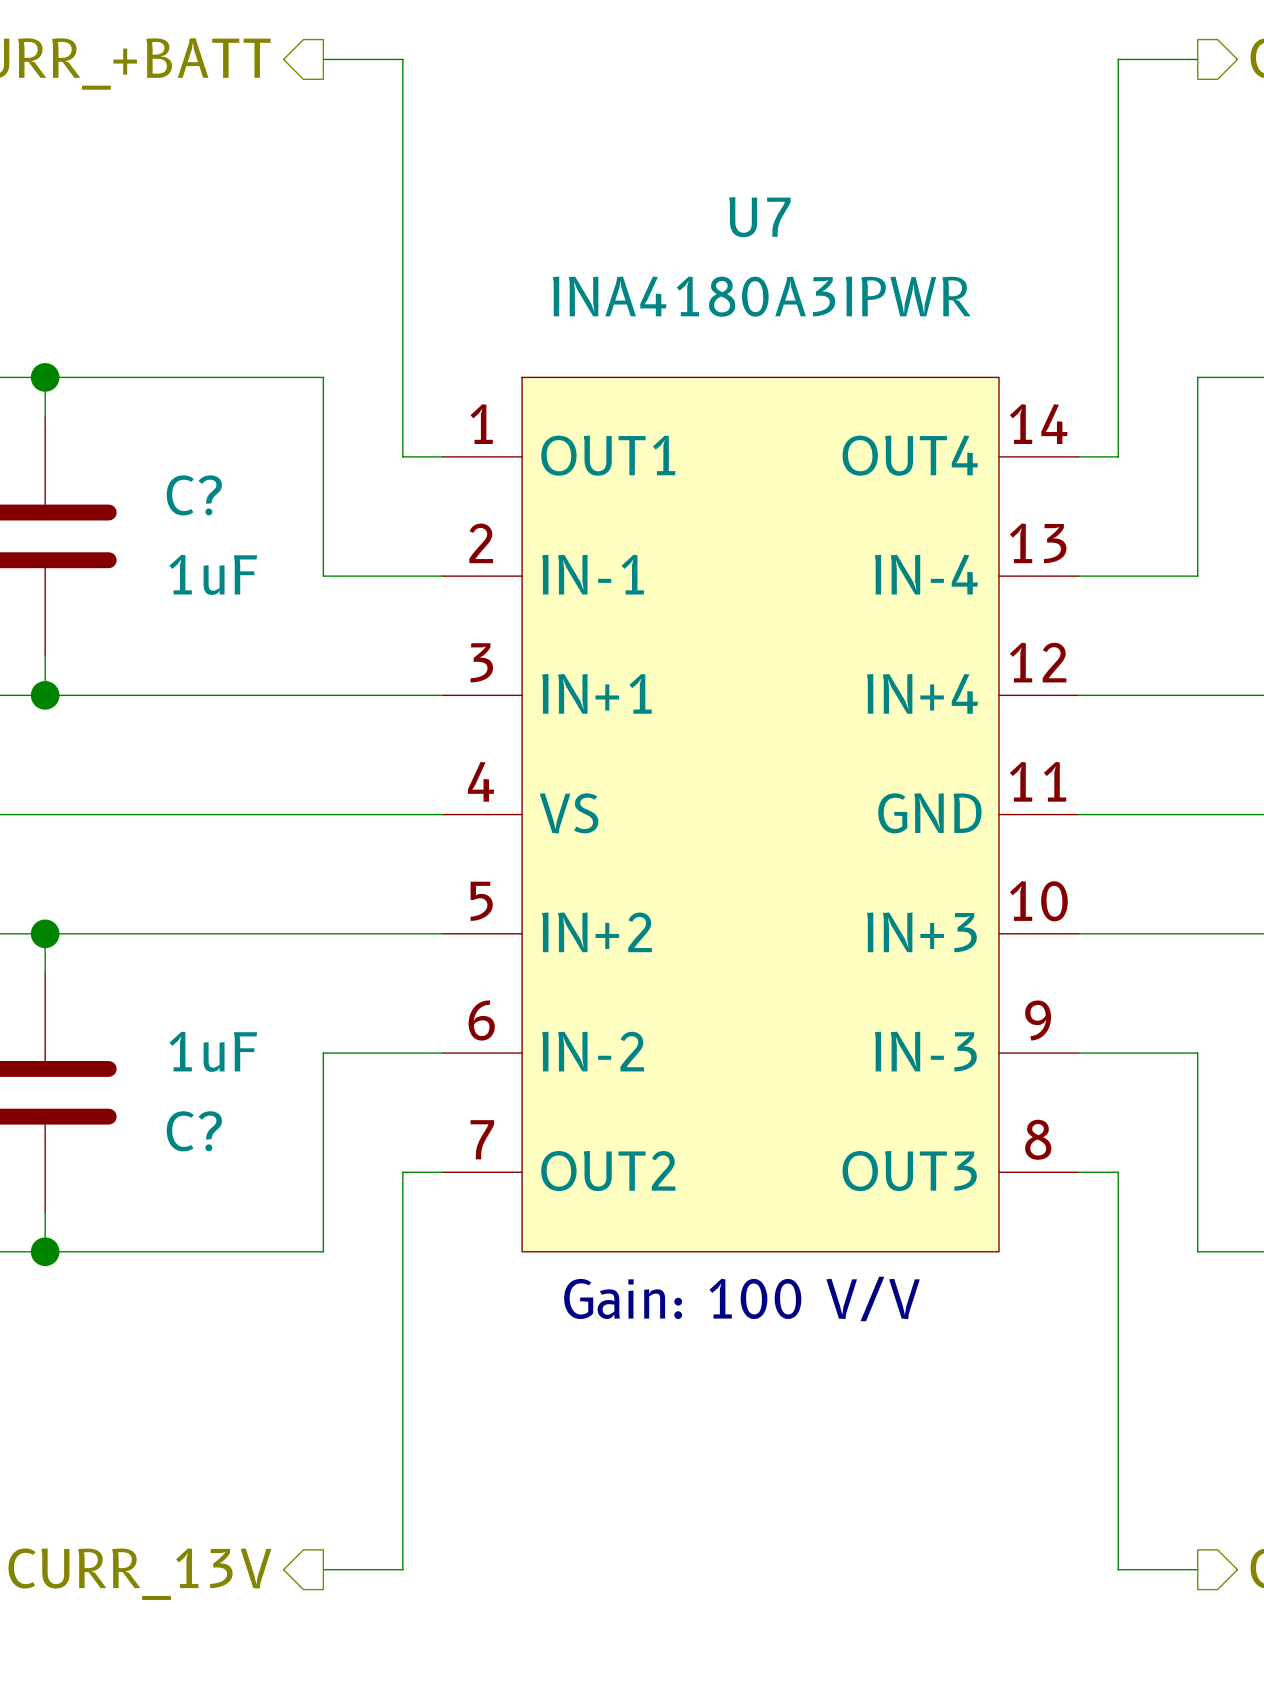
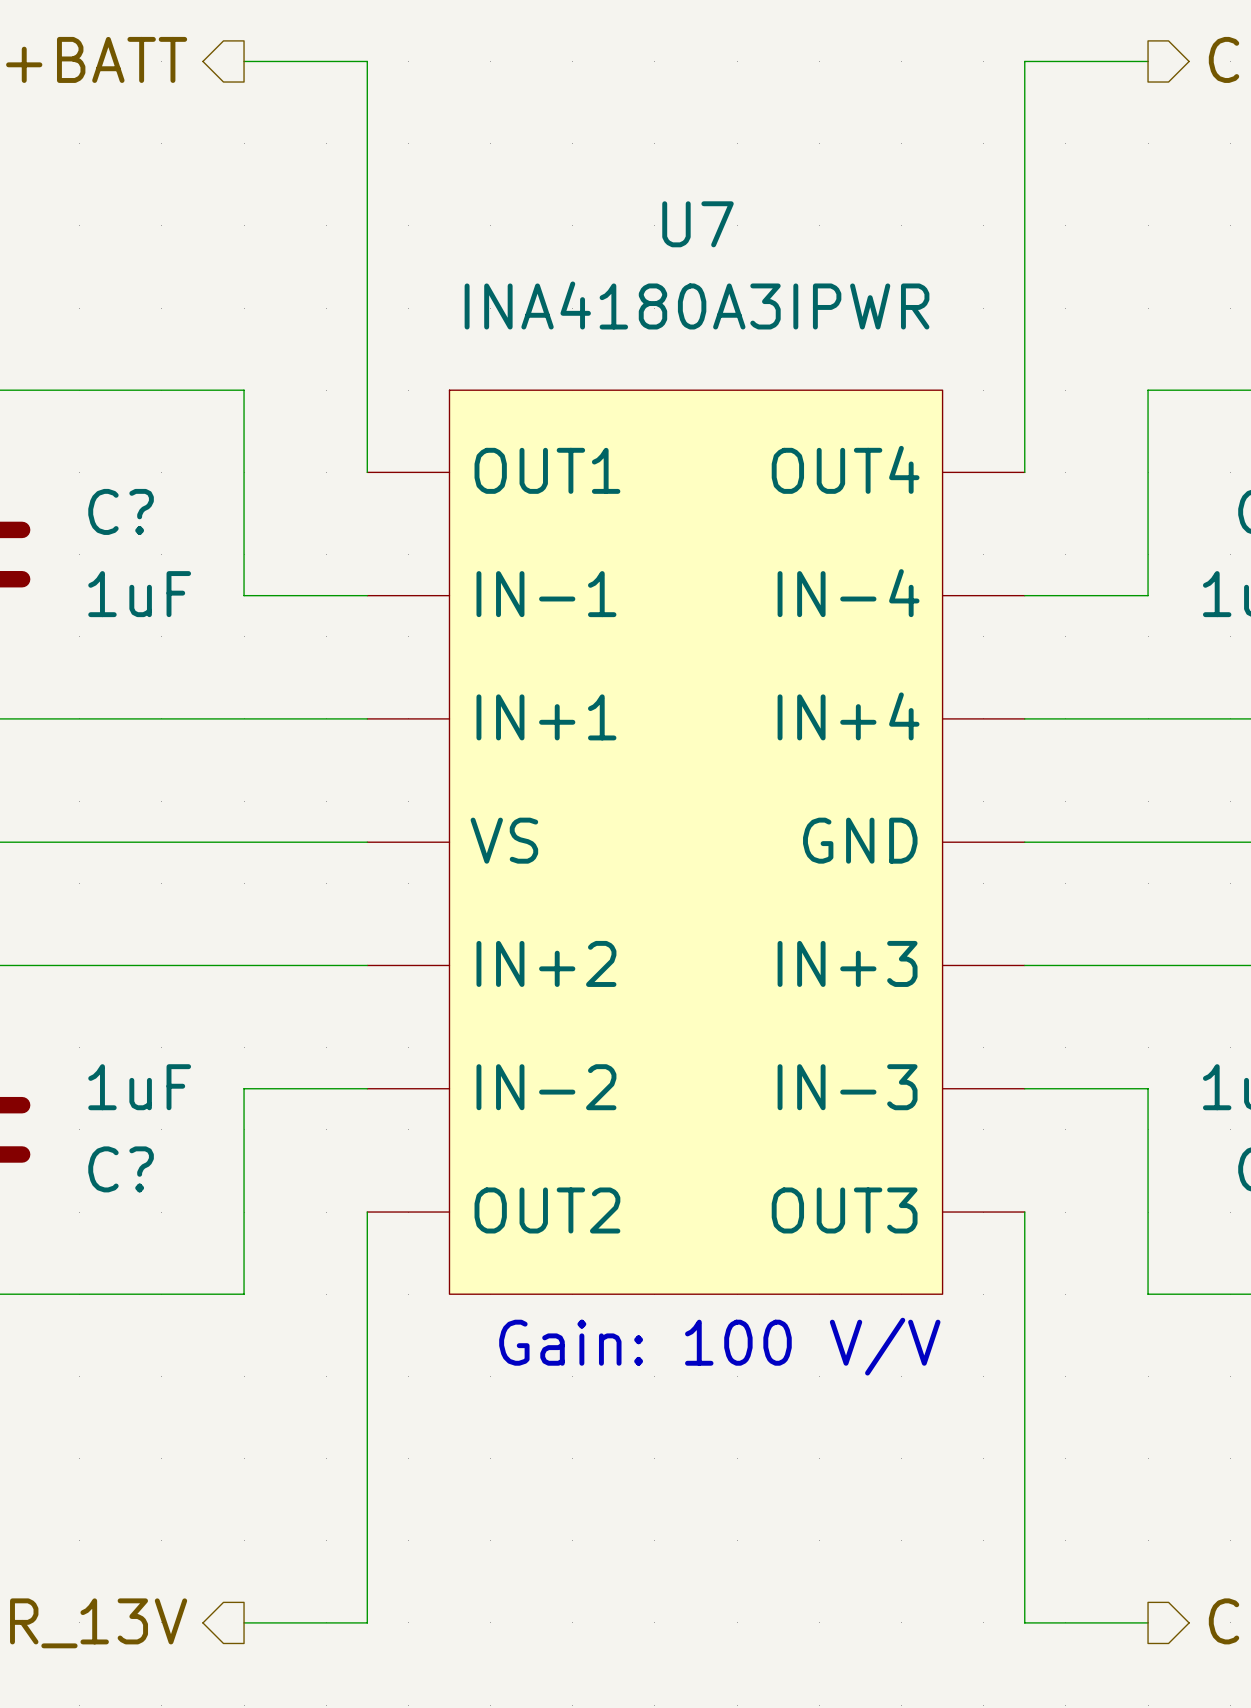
wire: (402, 59) (402, 456) (442, 456) -> (326, 61) (367, 61) (367, 472)
wire: (1118, 59) (1118, 456) (1078, 456) -> (1065, 61) (1024, 61) (1024, 472)
U7 symbol: [442, 377, 1079, 1252] -> [367, 390, 1025, 1295]
wire: (442, 1172) (402, 1172) (402, 1569) -> (367, 1212) (367, 1622) (326, 1622)
wire: (1078, 1172) (1118, 1172) (1118, 1569) -> (1024, 1212) (1024, 1622) (1065, 1622)

